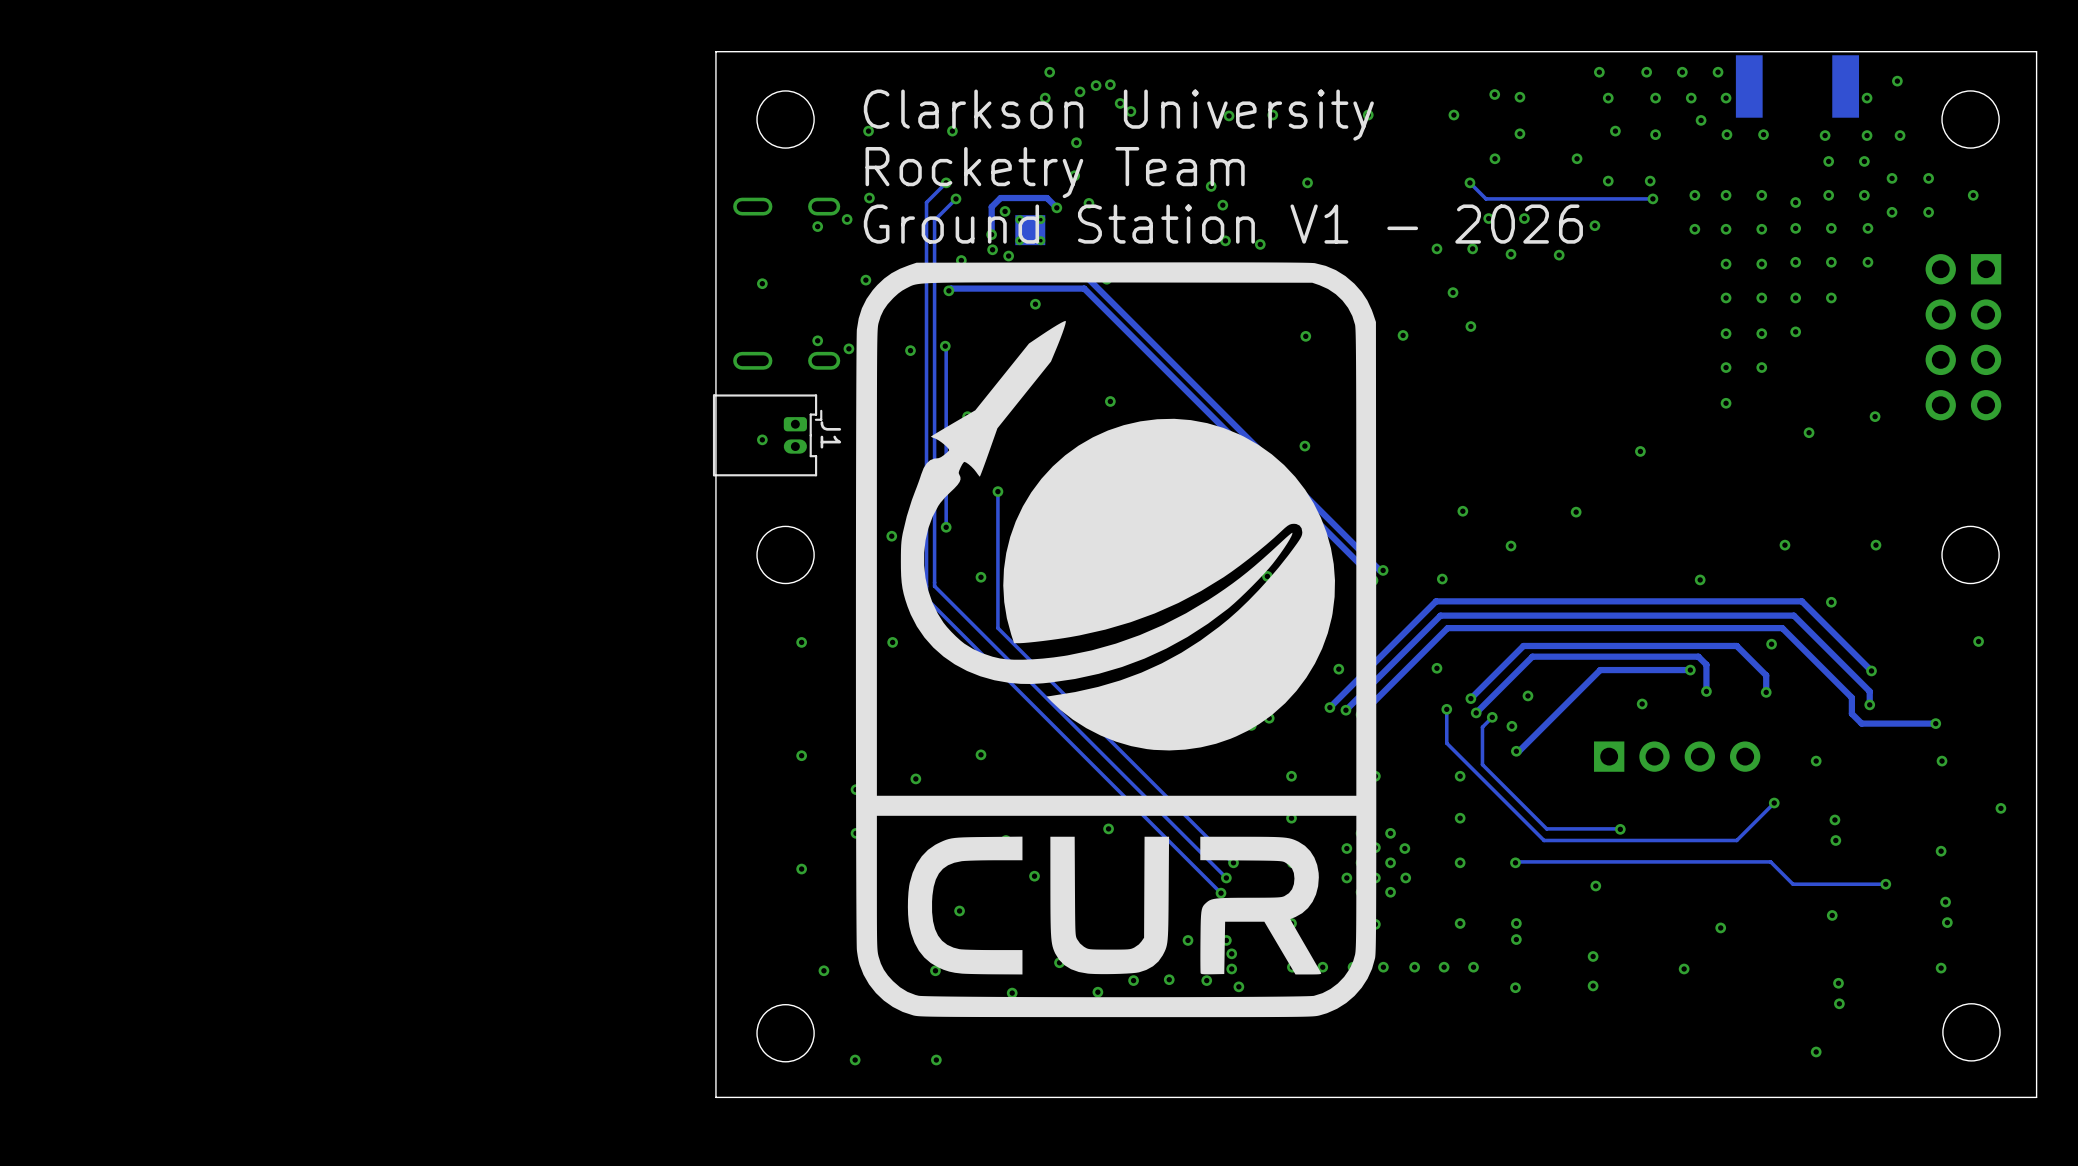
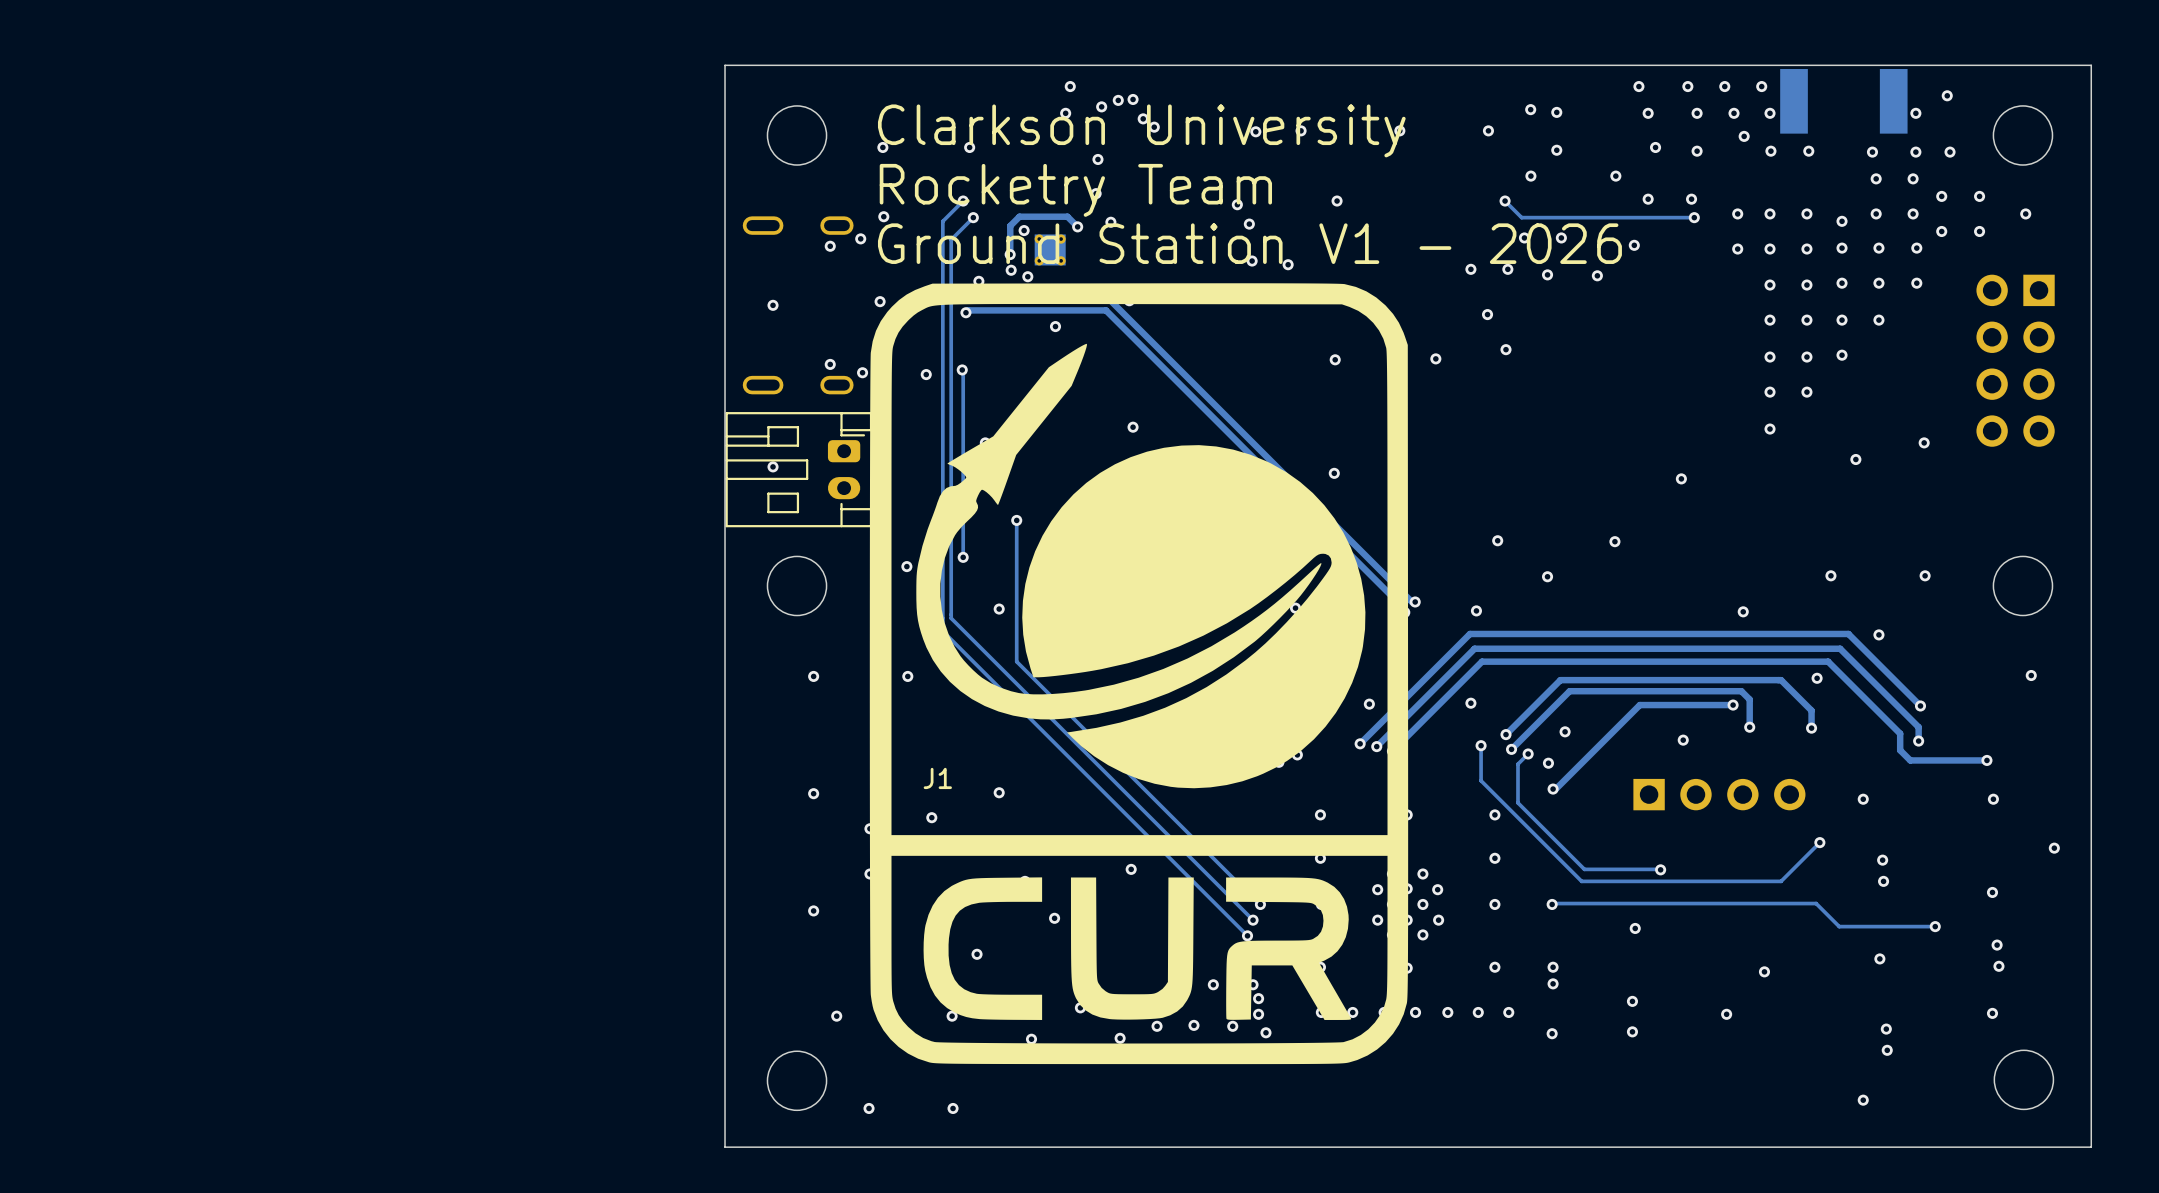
J1 footprint: [712, 394, 823, 477] -> [725, 412, 873, 528]
J1 name position: J1 (830, 434) -> J1 (937, 778)

